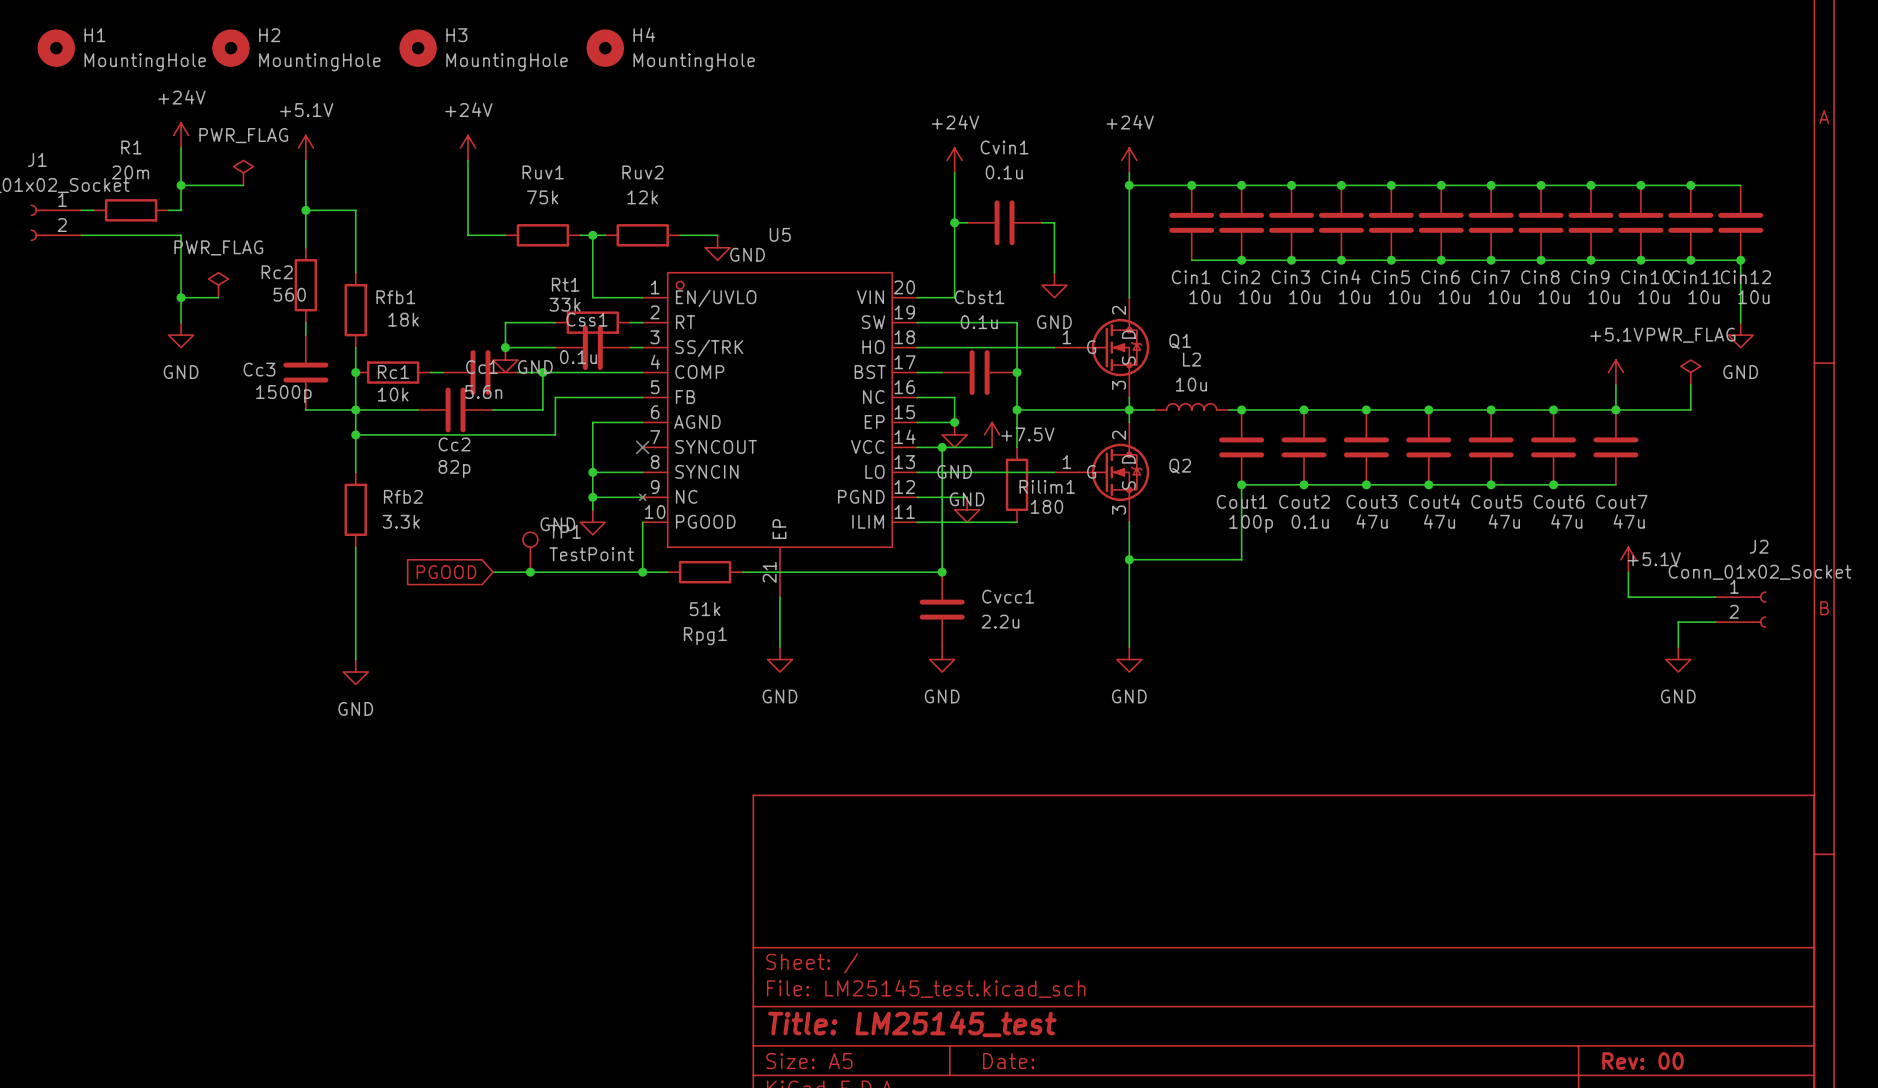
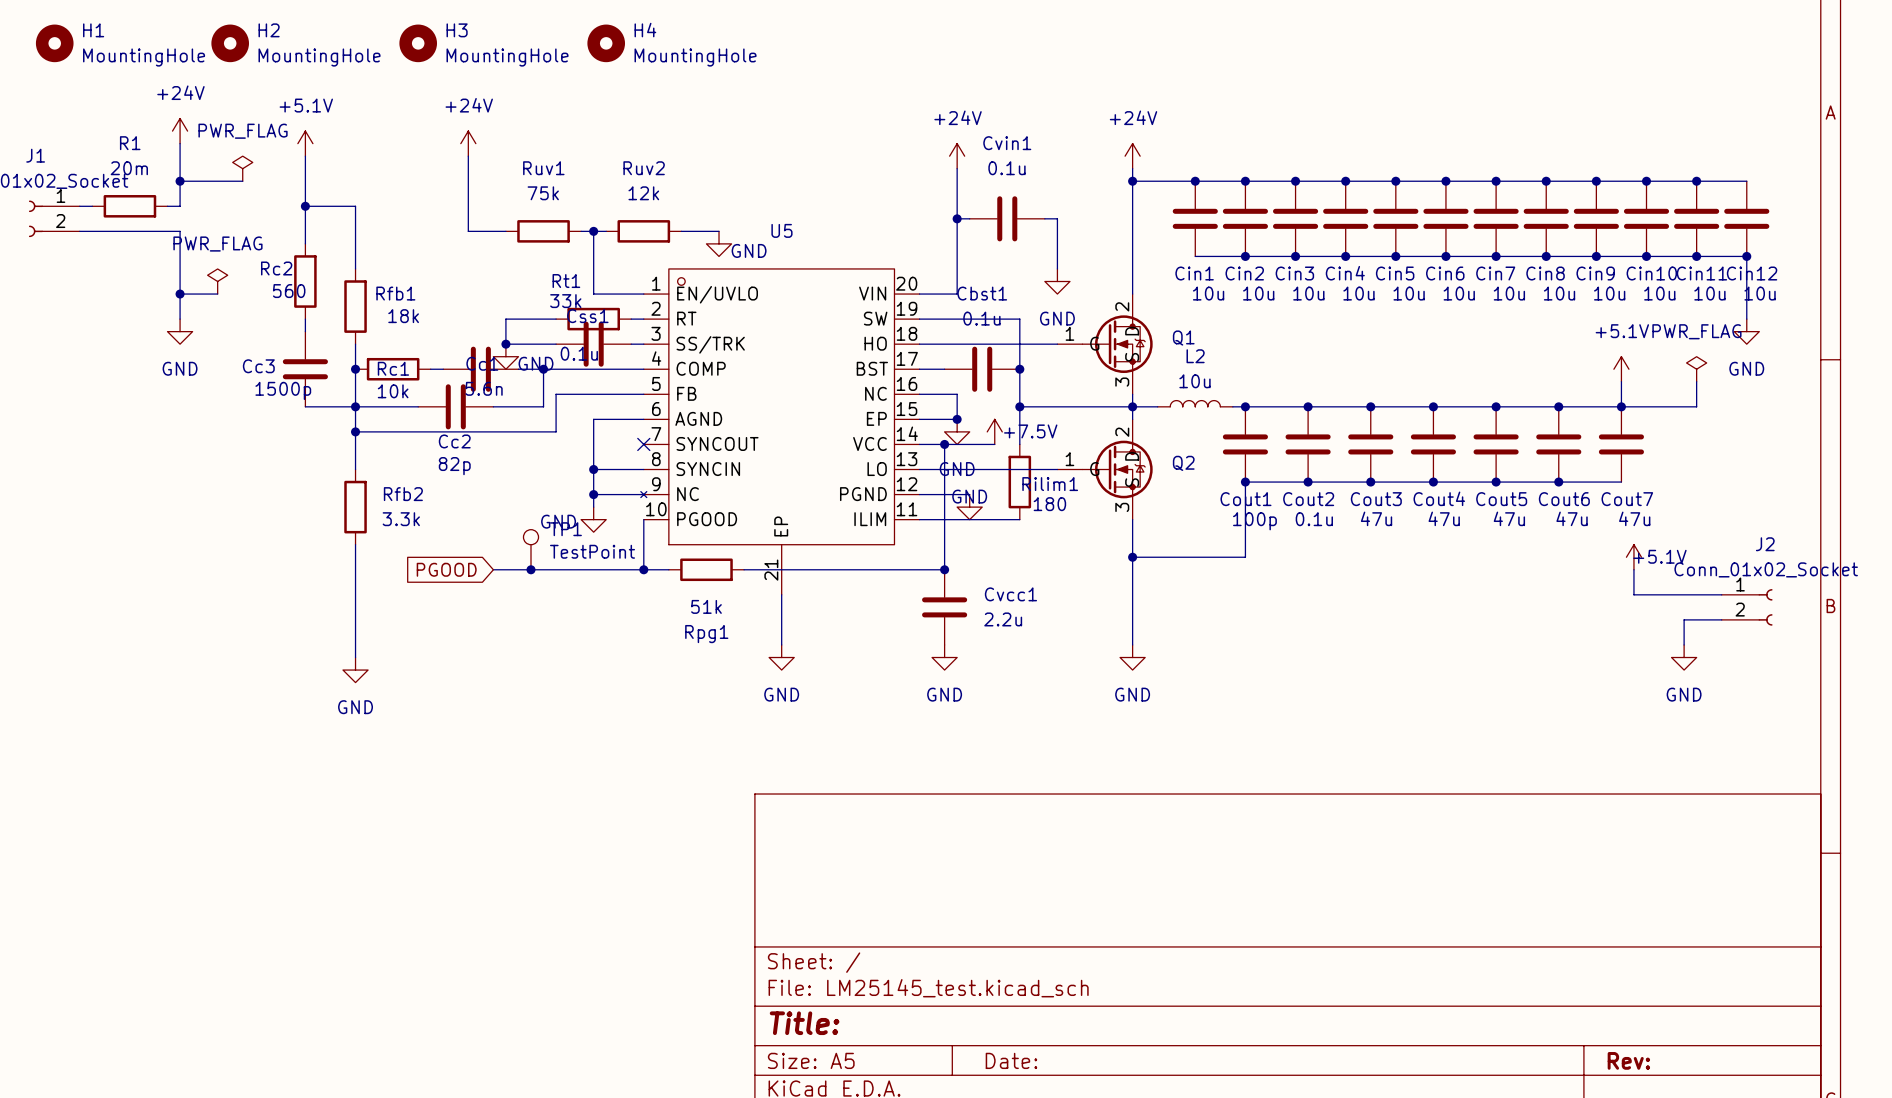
title block: Title: LM25145_test (912, 1024) -> Title: (804, 1023)
title block: Rev: 00 (1642, 1061) -> Rev: (1628, 1060)

